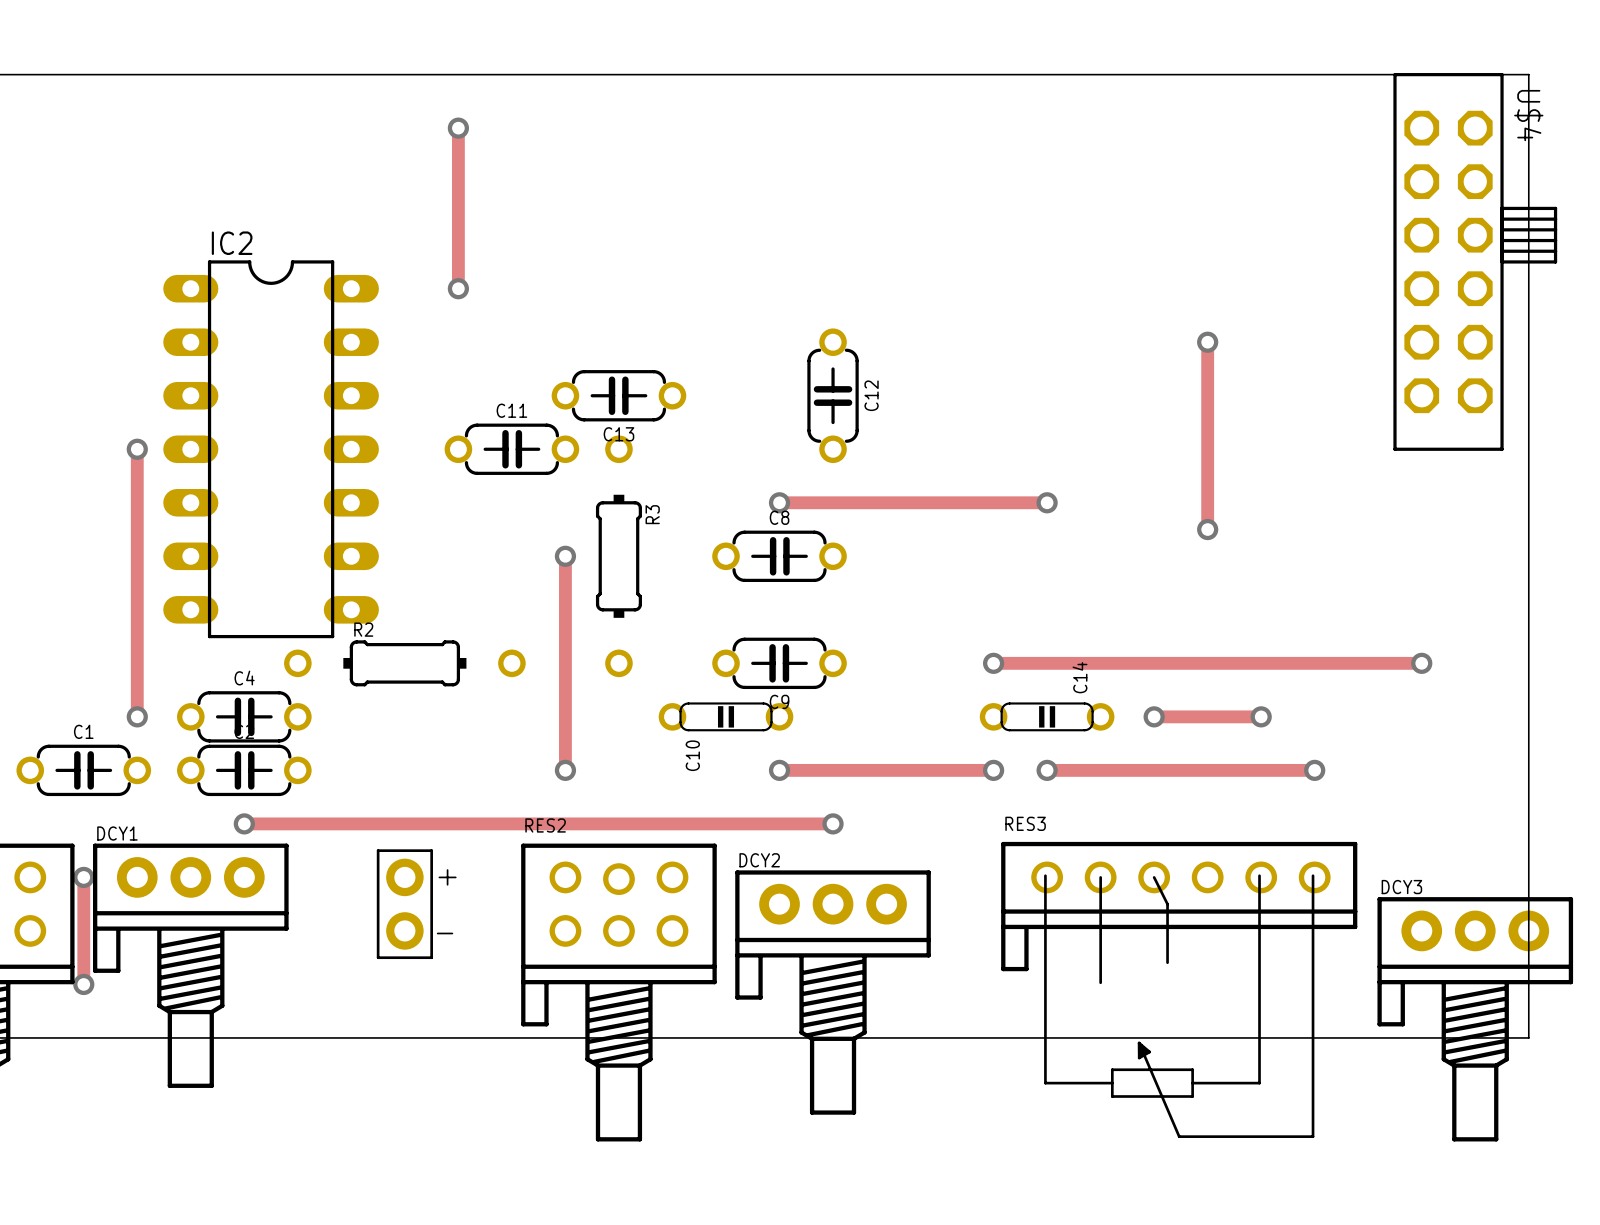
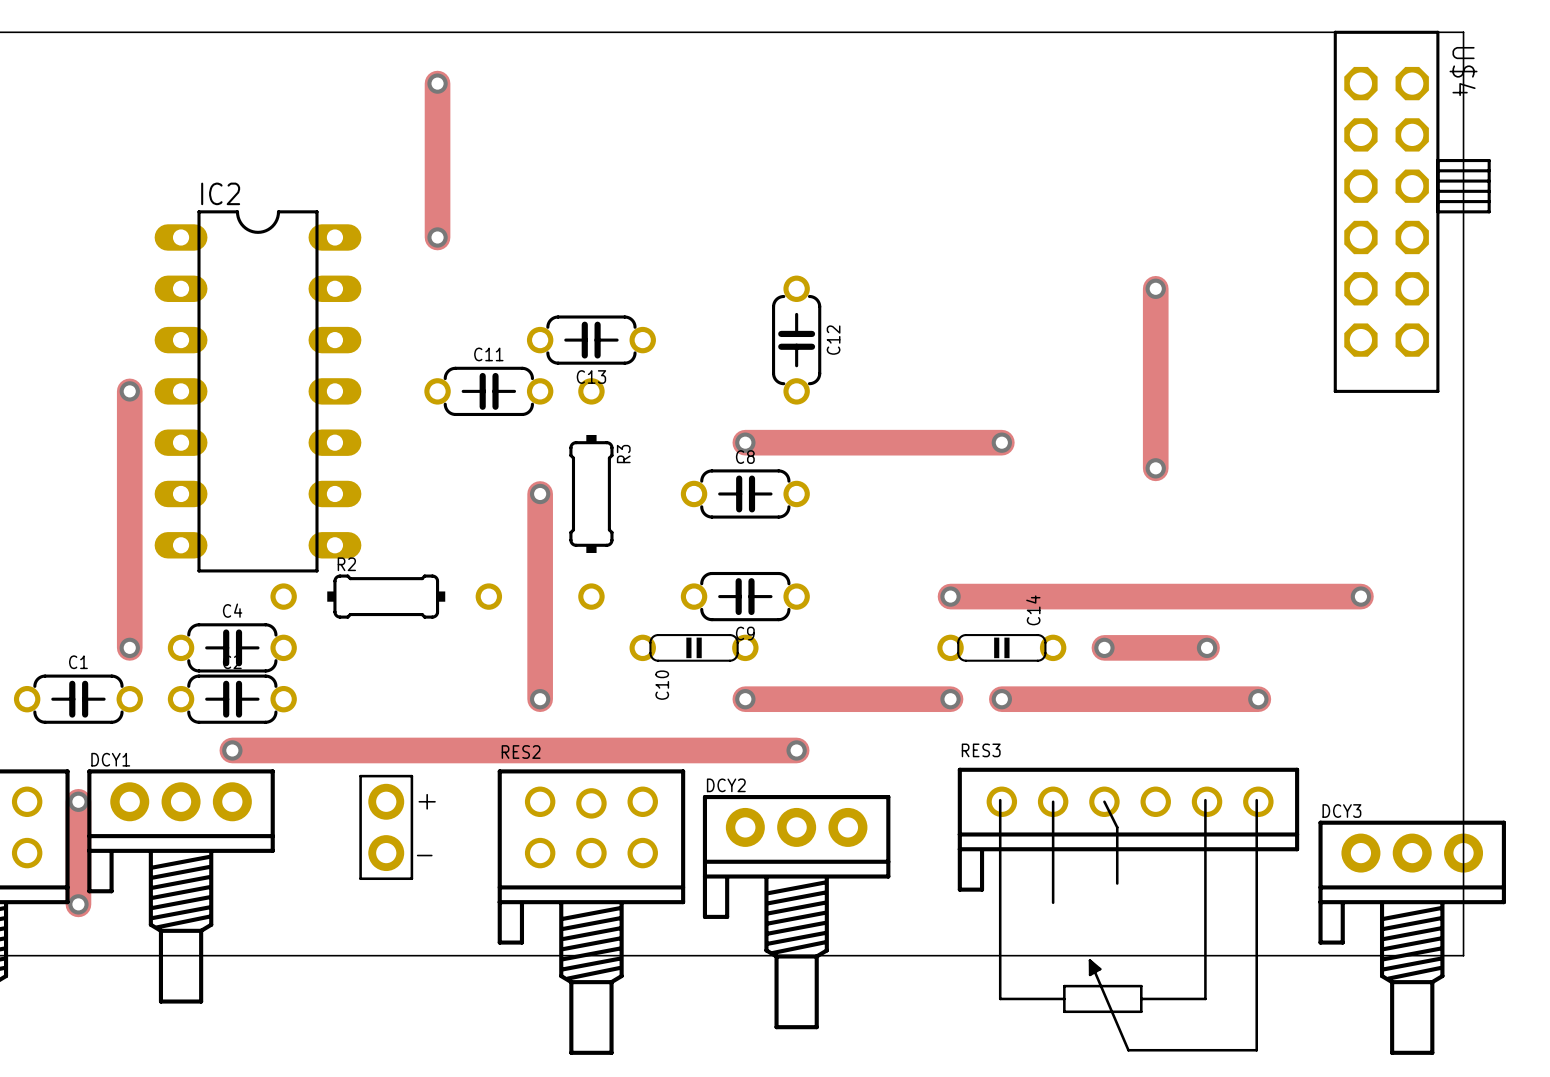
track width: thin (458, 128) (458, 288) -> thick (437, 83) (437, 237)
track width: thin (1207, 342) (1207, 529) -> thick (1155, 288) (1155, 468)
track width: thin (137, 449) (137, 716) -> thick (129, 391) (129, 647)
track width: thin (779, 502) (1047, 502) -> thick (745, 442) (1001, 442)
track width: thin (565, 556) (565, 770) -> thick (540, 493) (540, 699)
track width: thin (993, 663) (1421, 663) -> thick (950, 596) (1360, 596)
track width: thin (1154, 716) (1261, 716) -> thick (1104, 647) (1207, 647)
track width: thin (779, 770) (993, 770) -> thick (745, 699) (950, 699)
track width: thin (1047, 770) (1314, 770) -> thick (1001, 699) (1258, 699)
track width: thin (244, 823) (833, 823) -> thick (232, 750) (796, 750)
track width: thin (83, 877) (83, 984) -> thick (78, 801) (78, 904)

